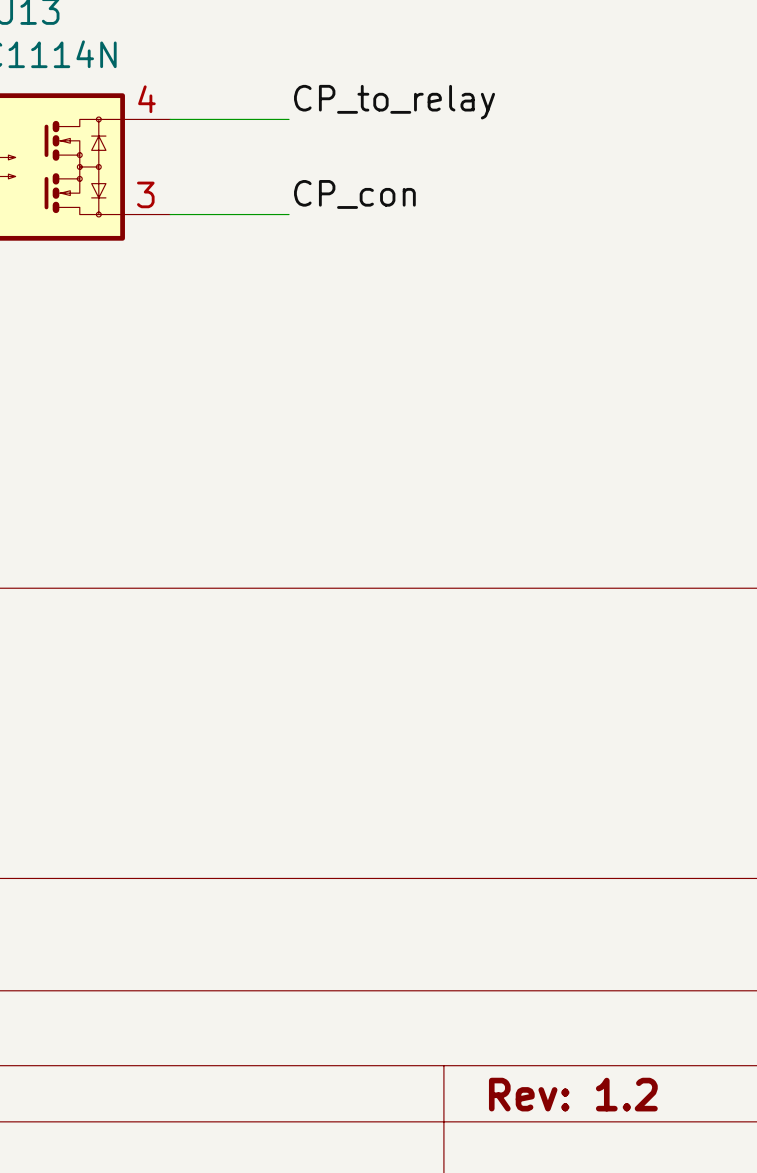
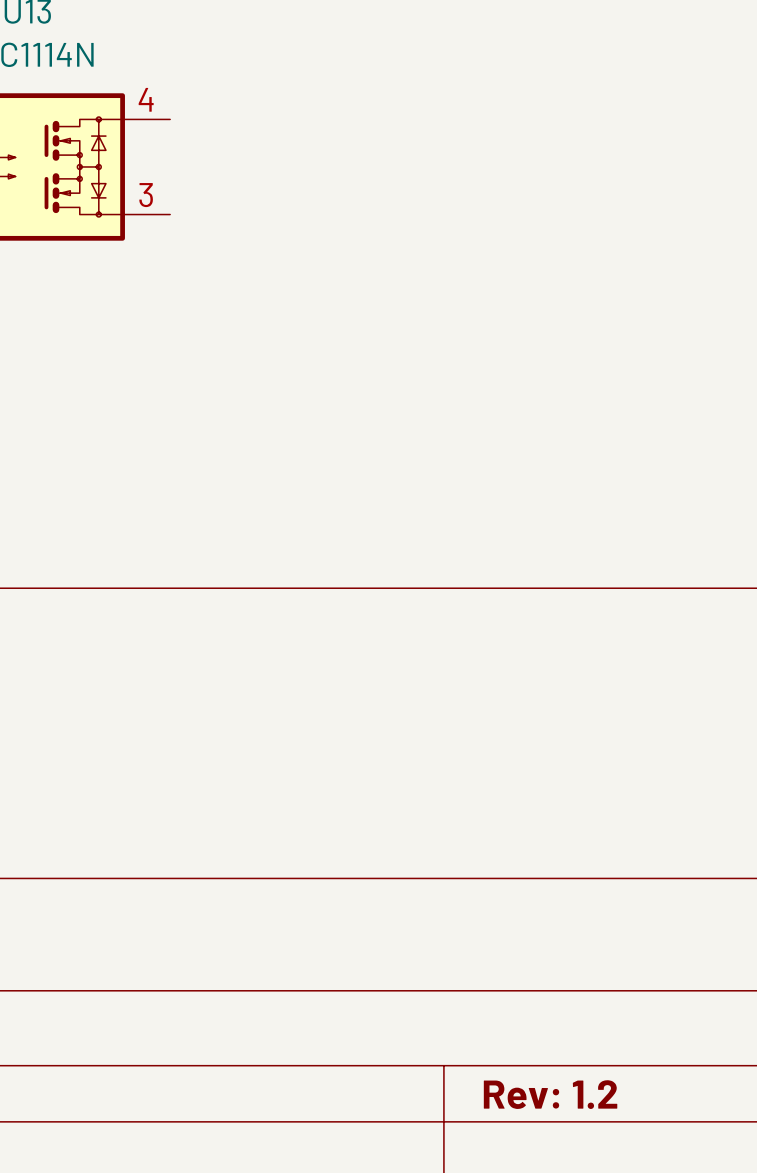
label: CP_to_relay (394, 102) -> none
wire: (170, 119) (289, 119) -> none
label: CP_con (354, 194) -> none
wire: (170, 214) (289, 214) -> none

